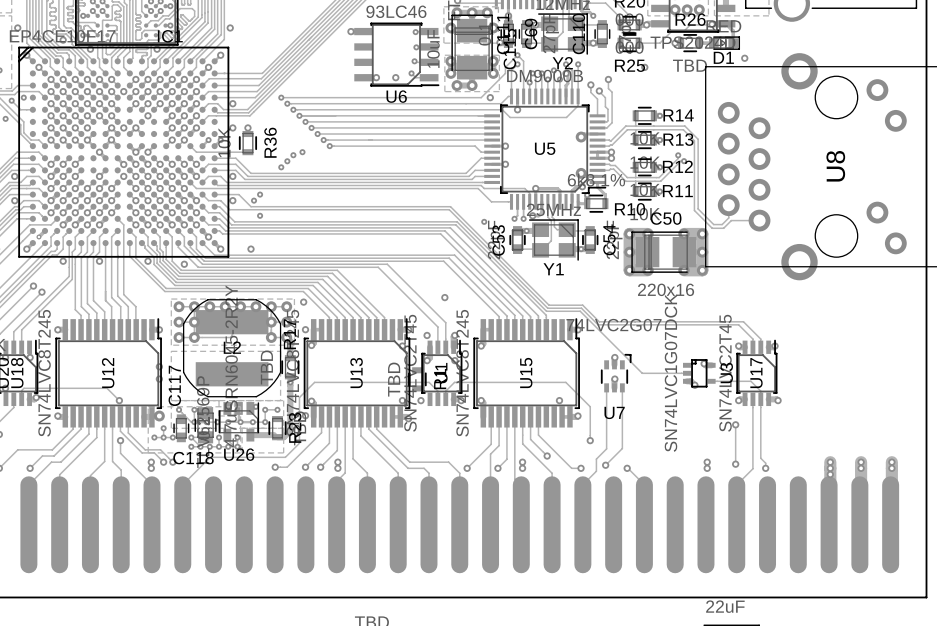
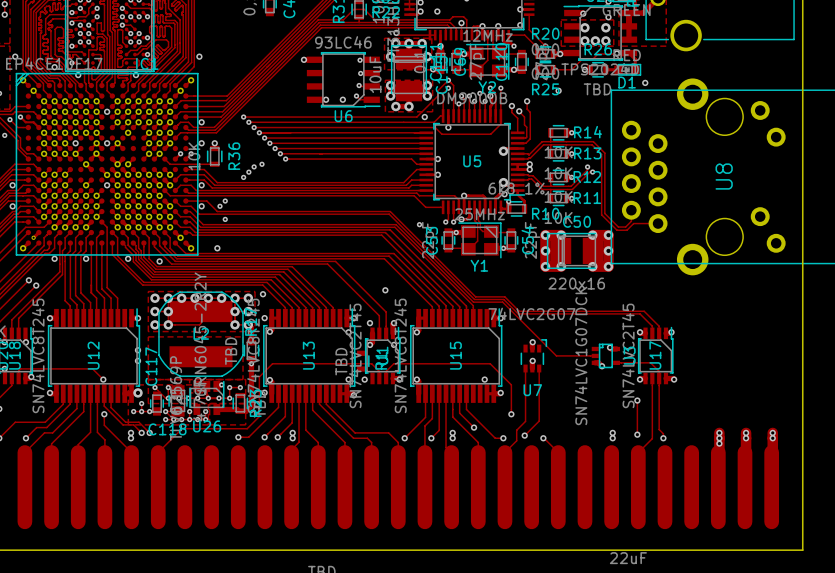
track: none -> (20, 117) (25, 122) (33, 122) (38, 127)

